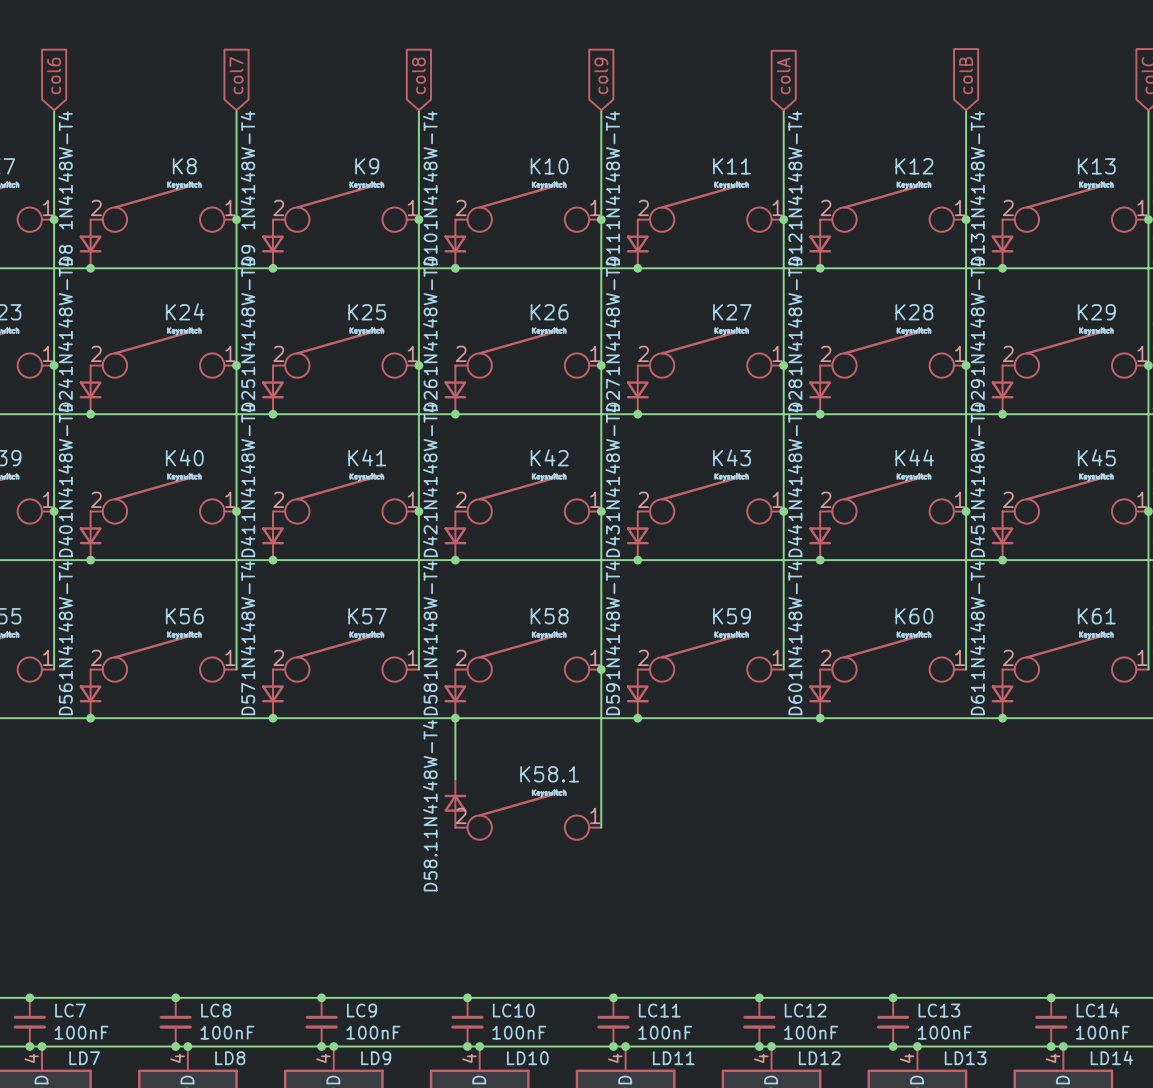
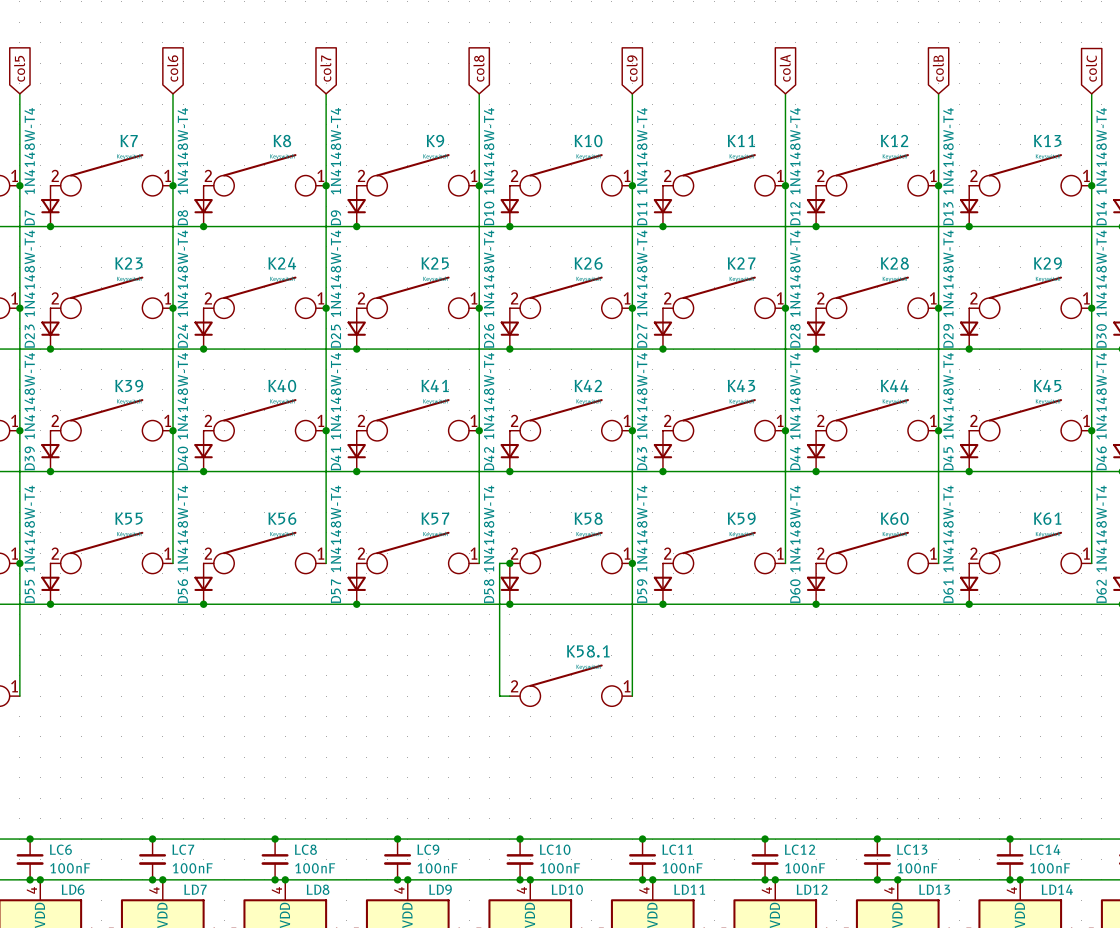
wire: none -> (509, 563) (499, 563) (499, 696) (509, 696)
junction: none -> (509, 563)
wire: (455, 718) (455, 778) -> none
D58.1: 1N4148W-T4 (455, 803) -> none

